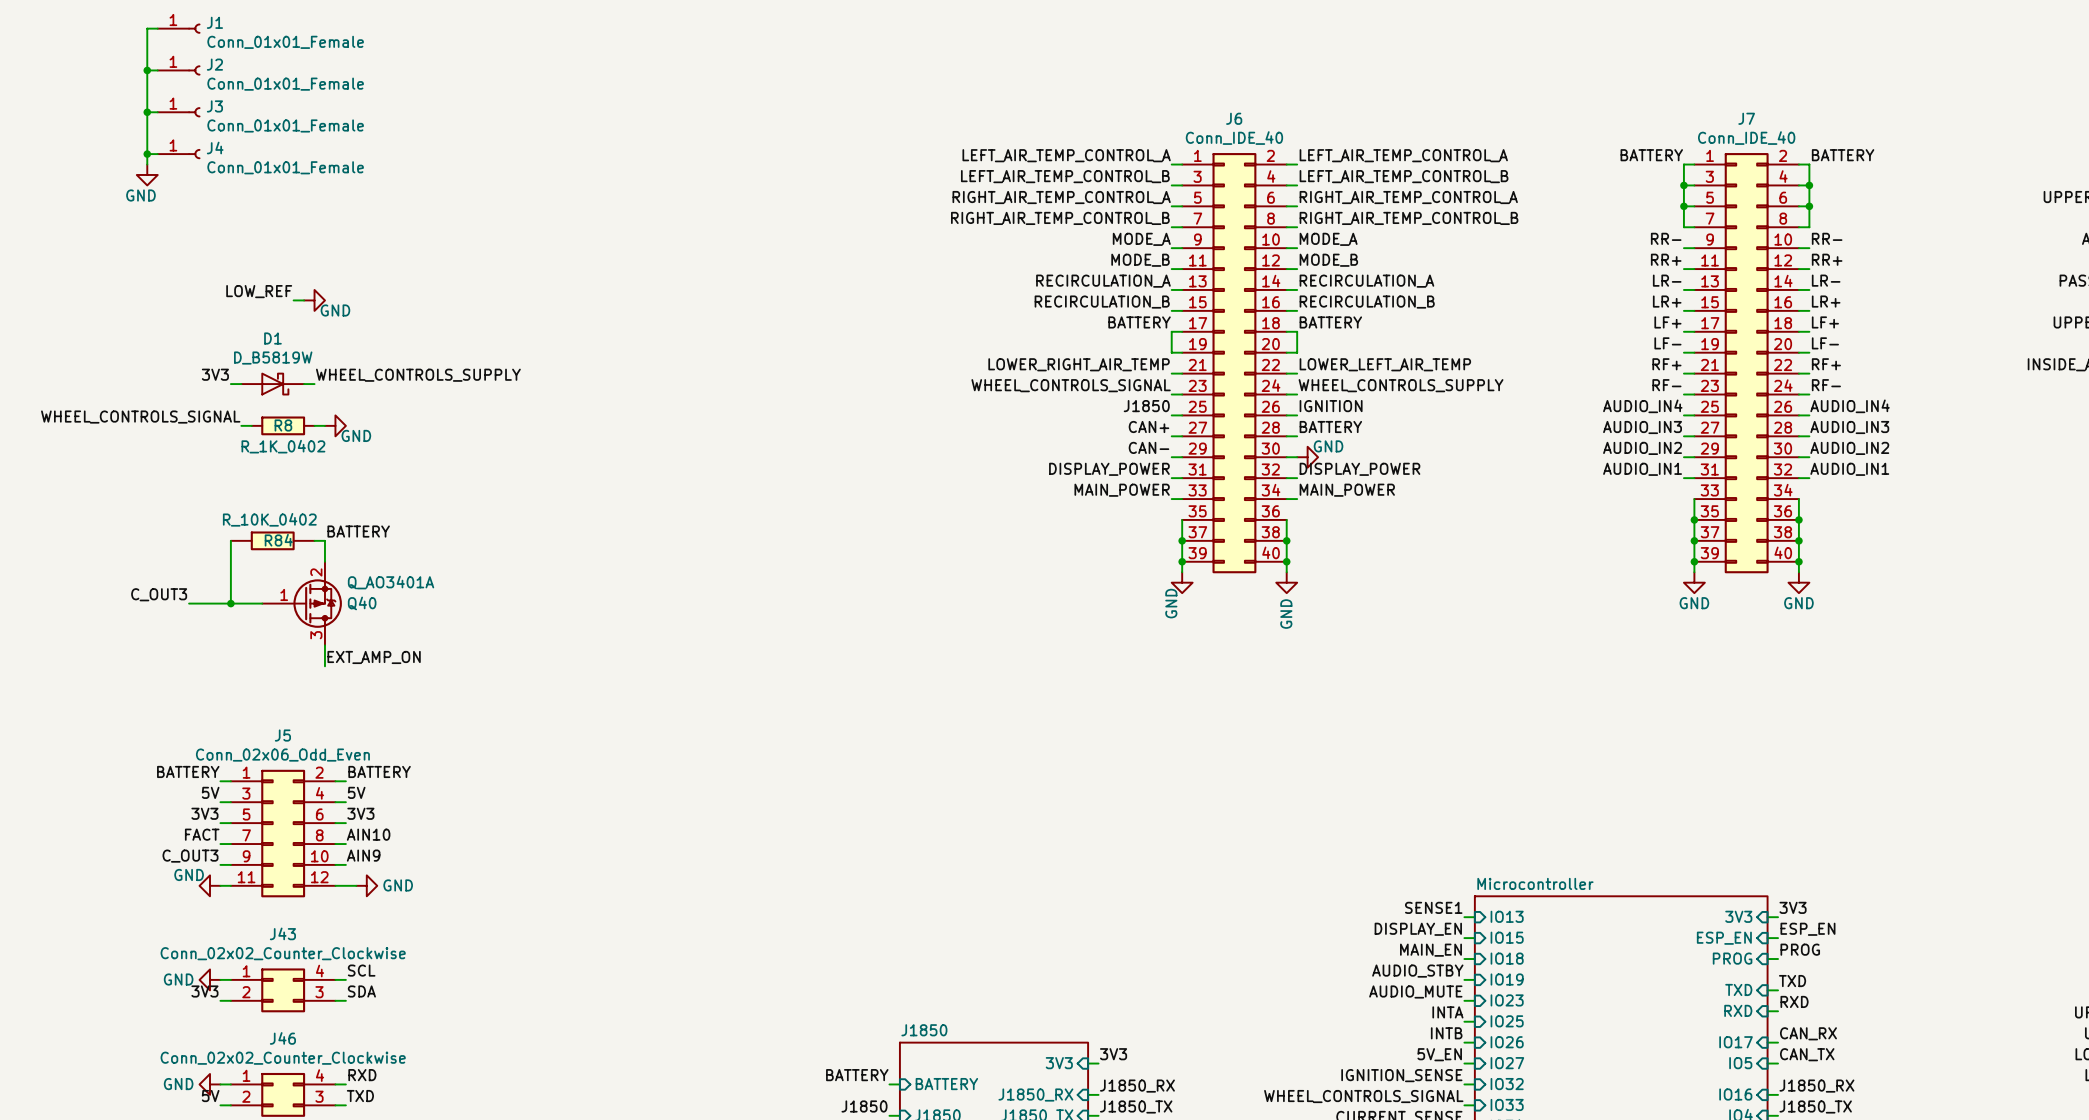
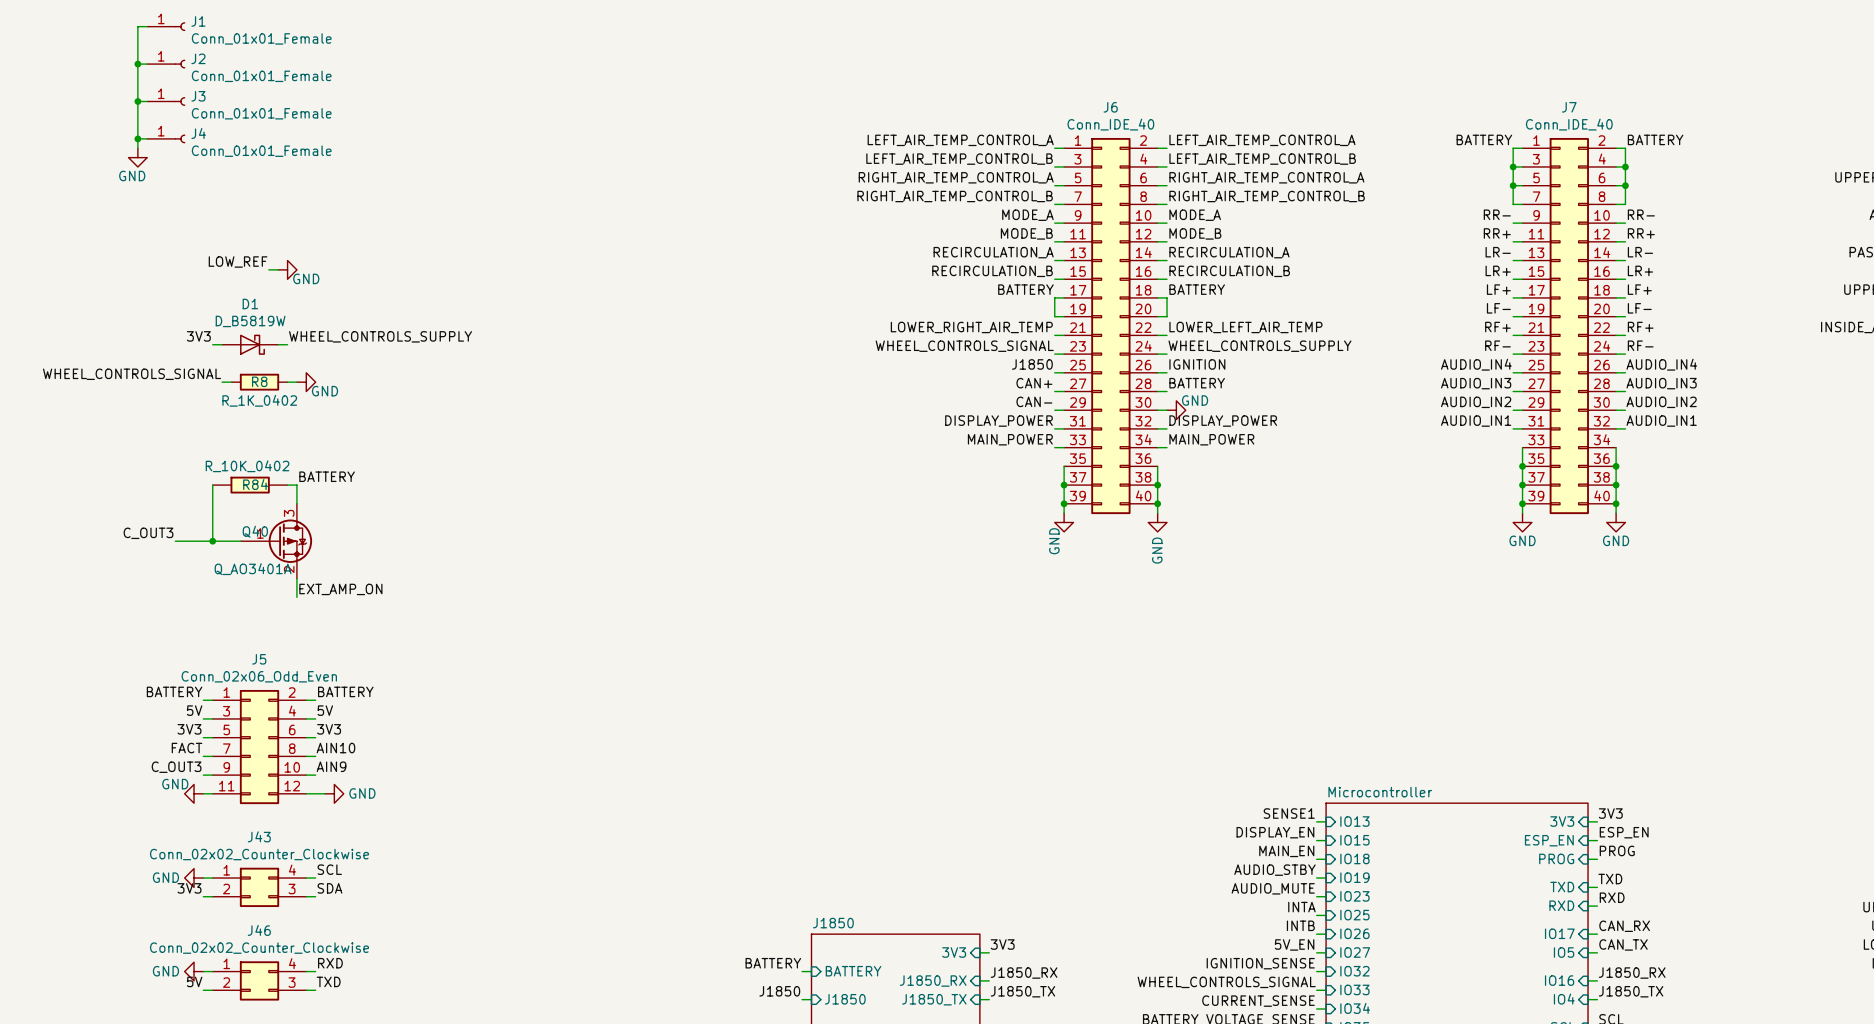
Q40 value position: Q_AO3401A (391, 582) -> Q_AO3401A (253, 569)
Q40 flip: as is (317, 603) -> up-down (290, 541)
Q40 name position: Q40 (362, 603) -> Q40 (255, 531)

